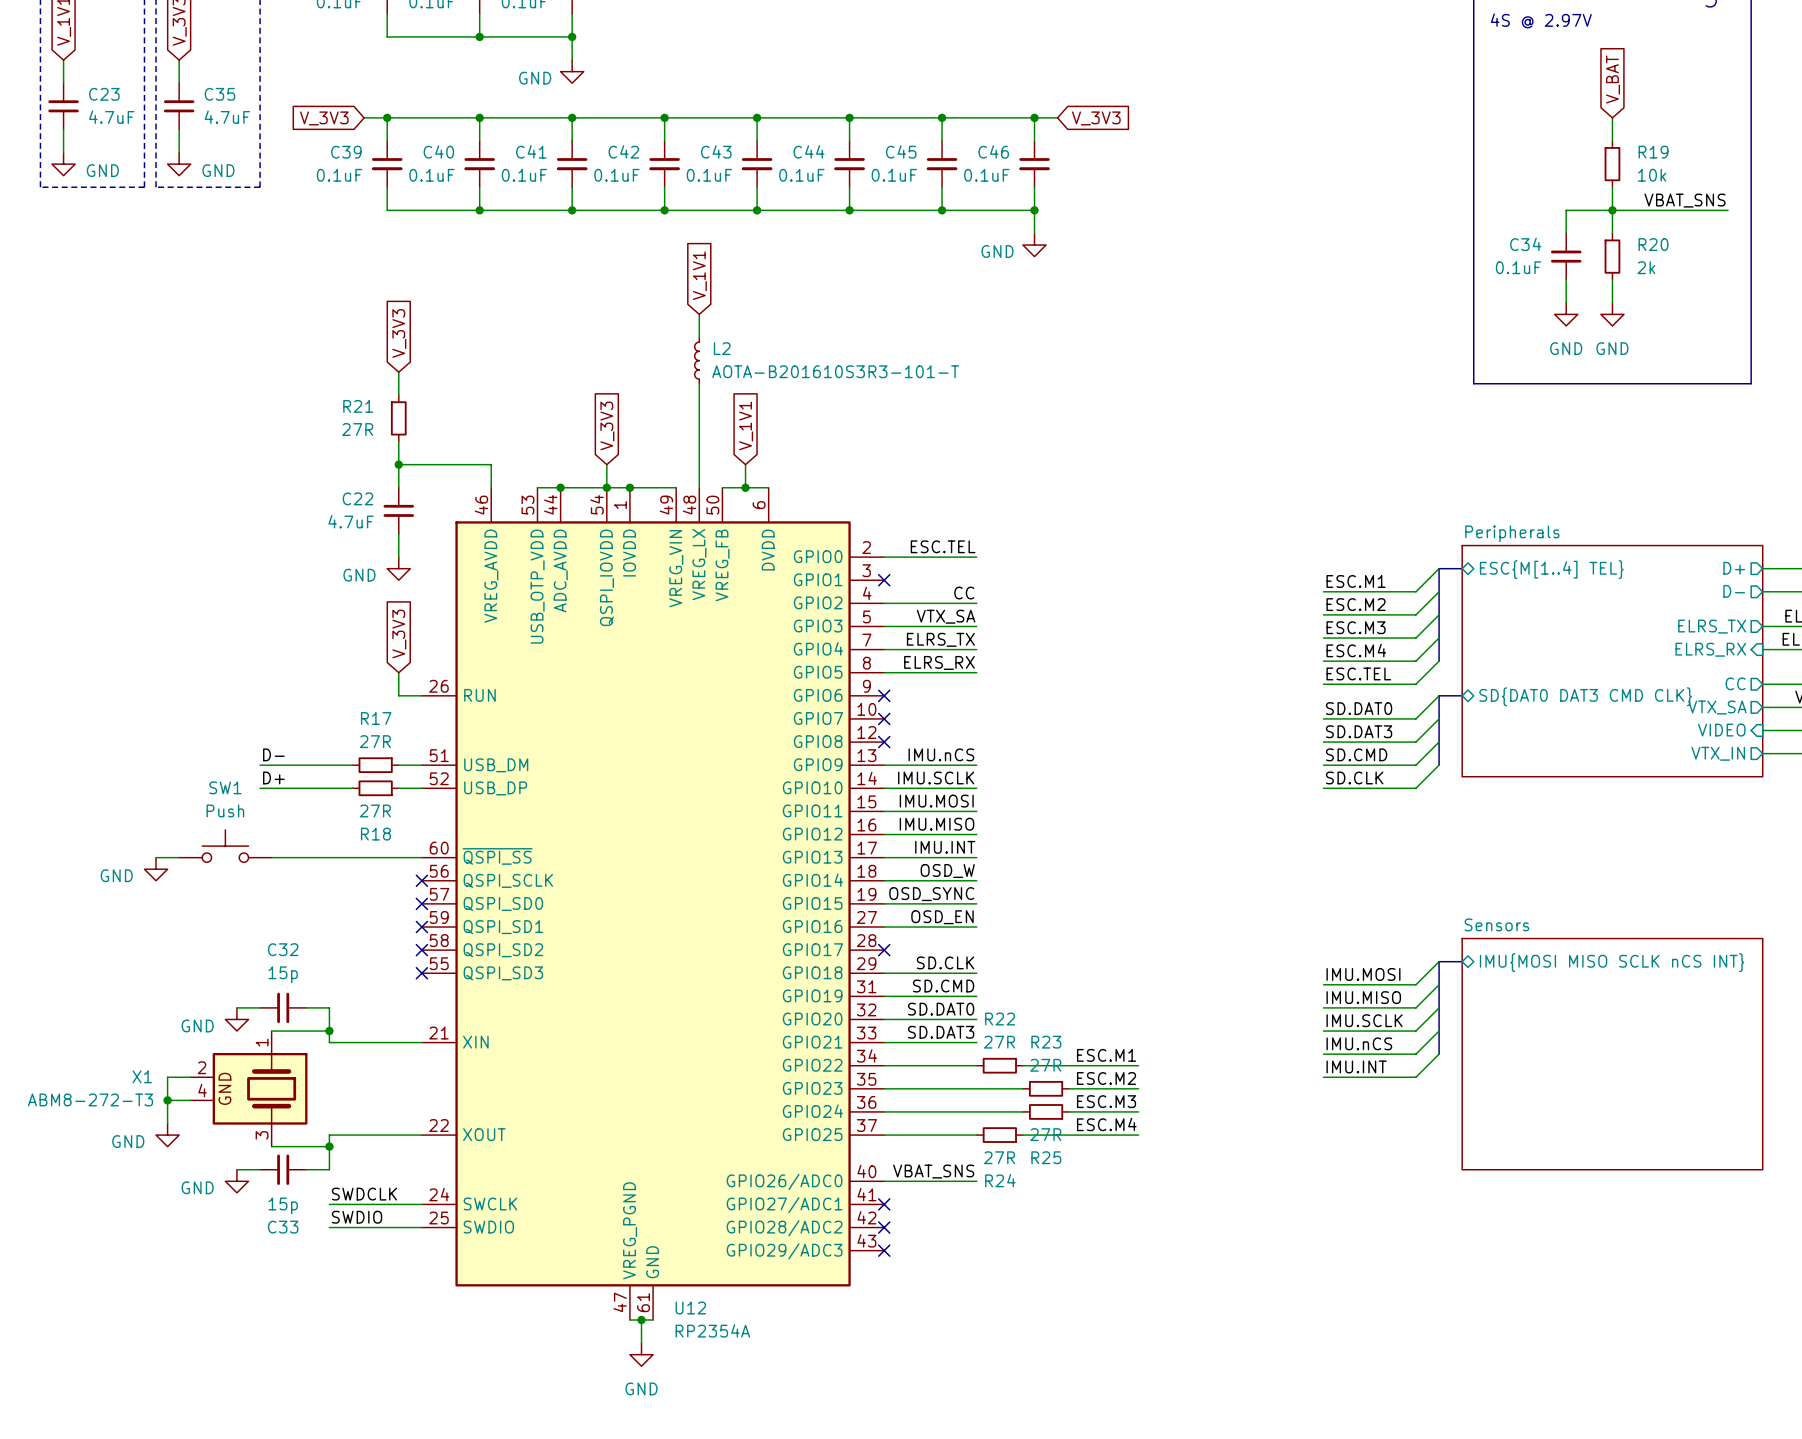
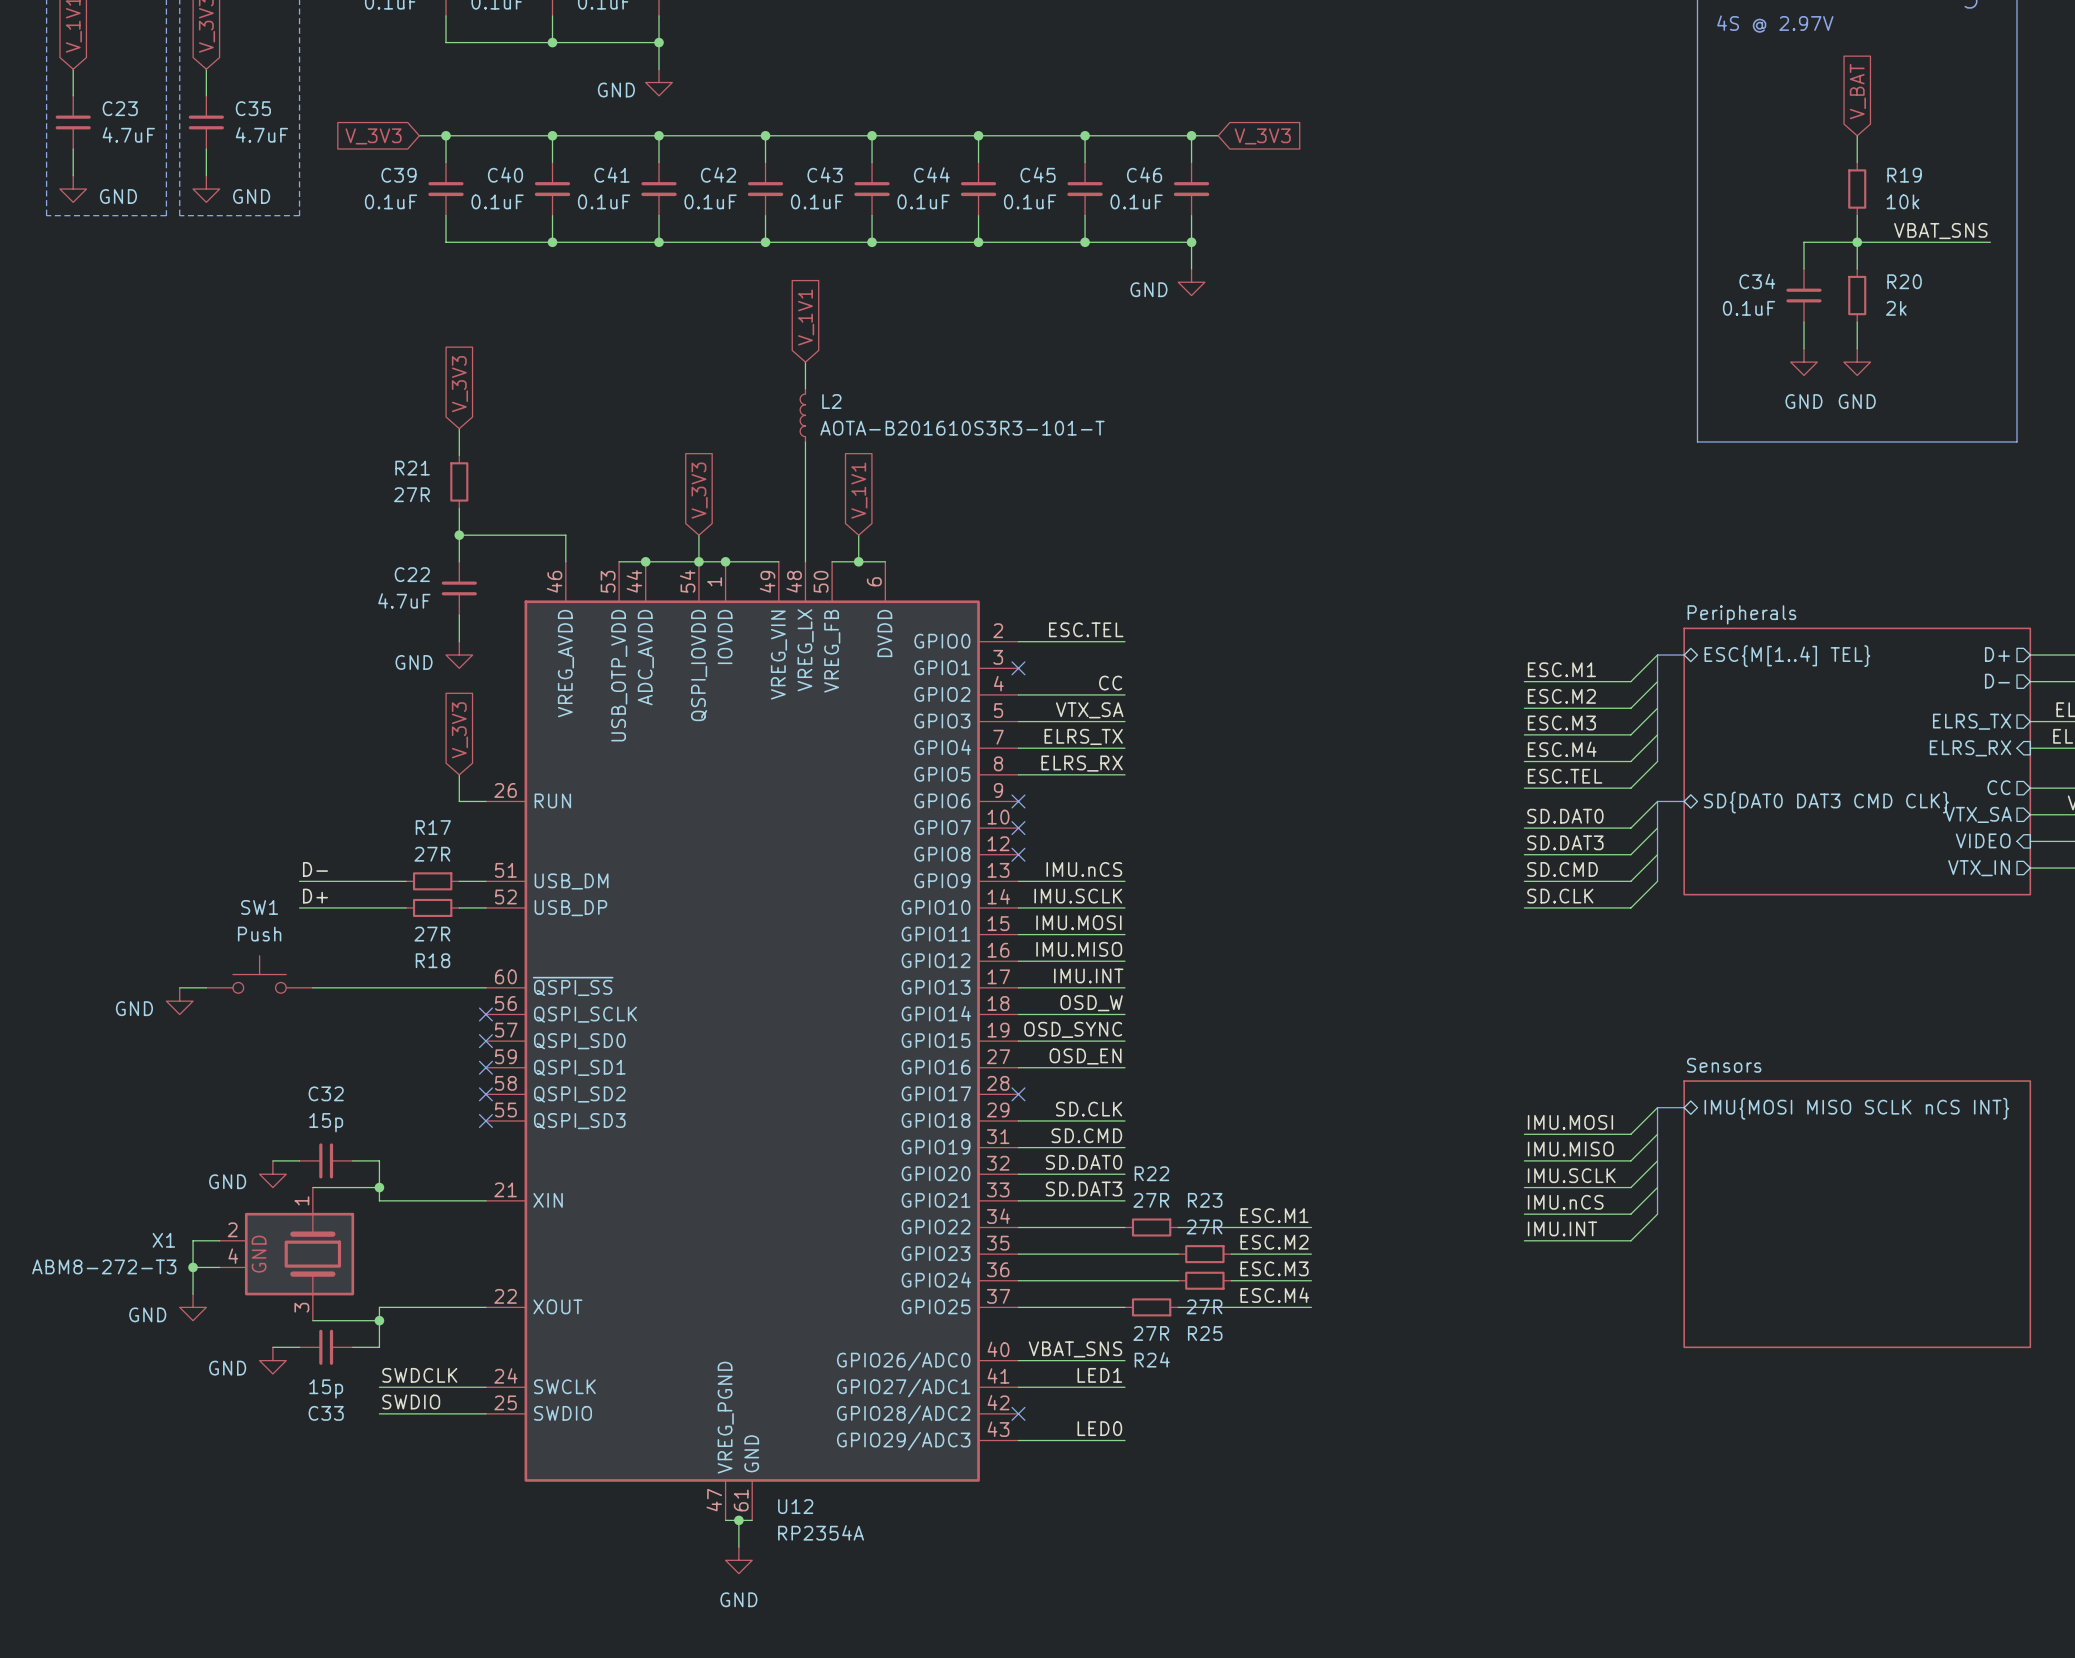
label: none -> LED1 (1099, 1375)
wire: none -> (1018, 1387) (1124, 1387)
no-connect mark: (884, 1204) -> none
label: none -> LED0 (1099, 1428)
wire: none -> (1018, 1440) (1124, 1440)
no-connect mark: (884, 1250) -> none

